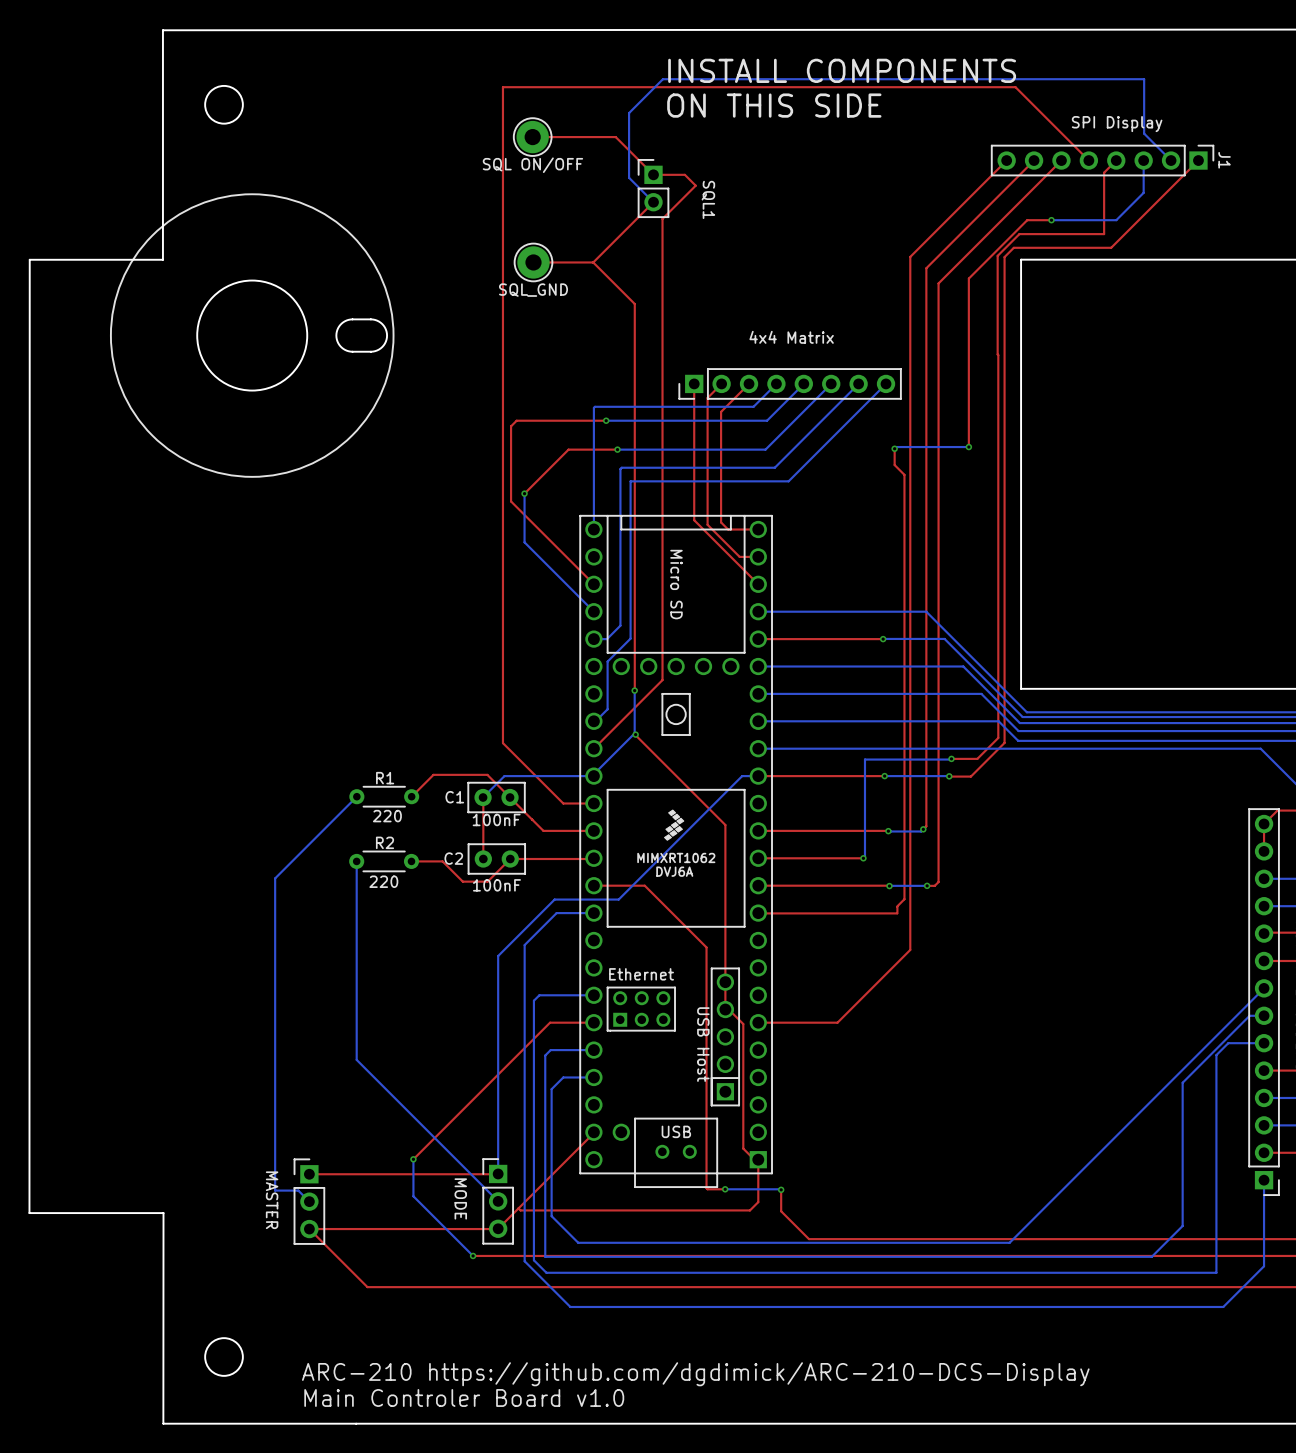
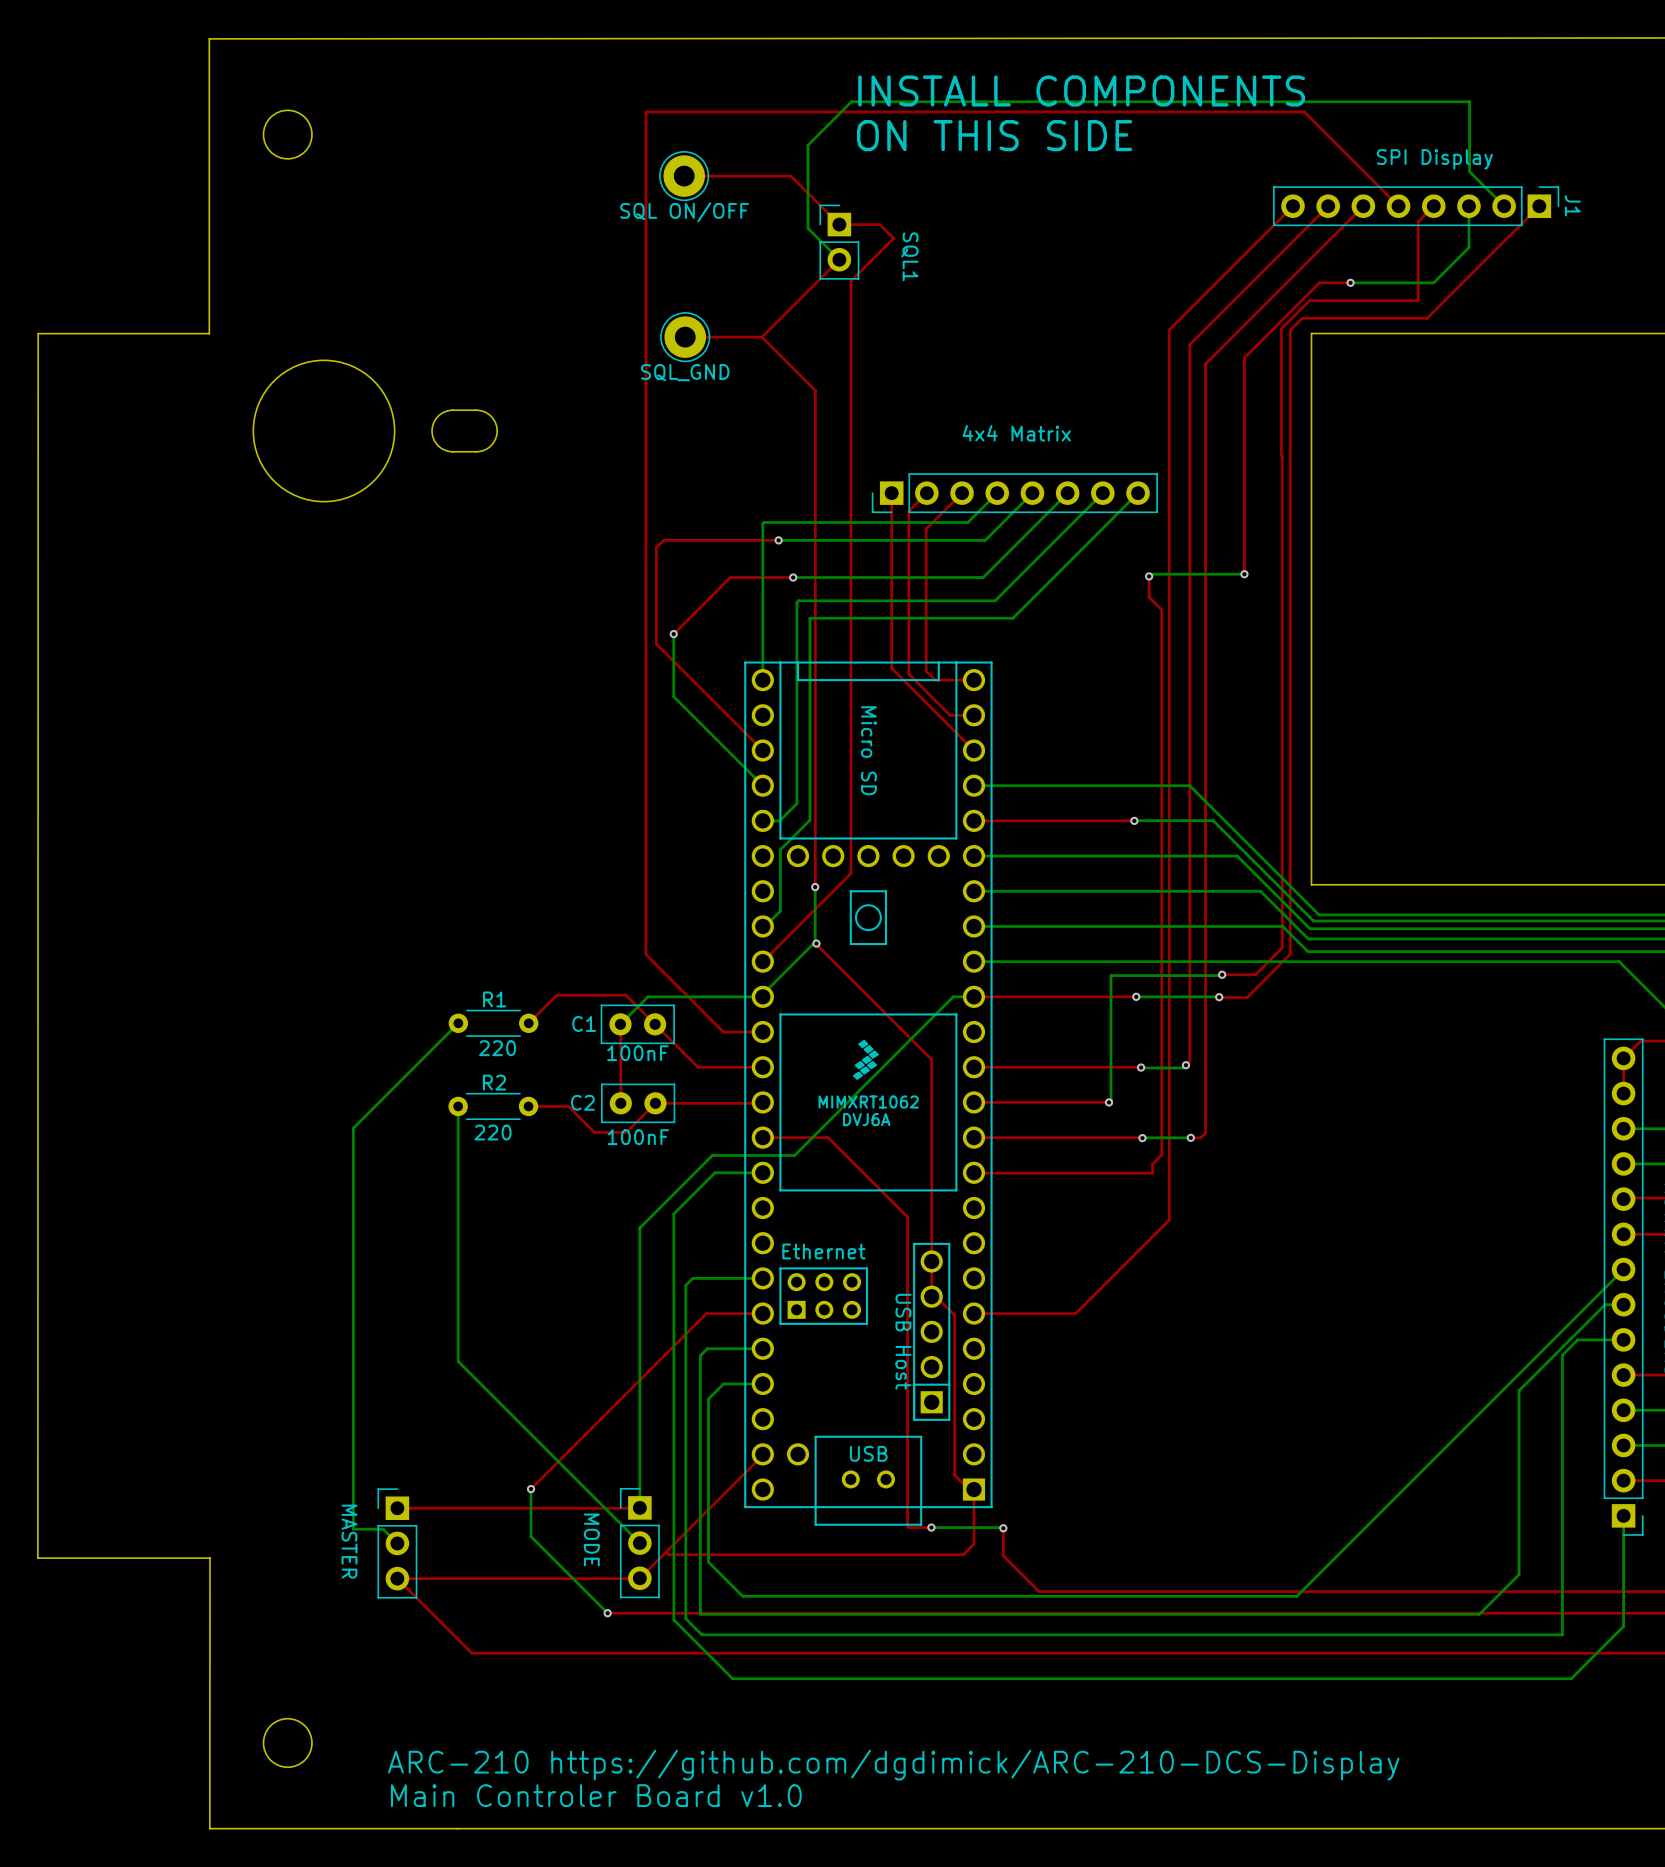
drawing: [110, 193, 395, 478] -> none

